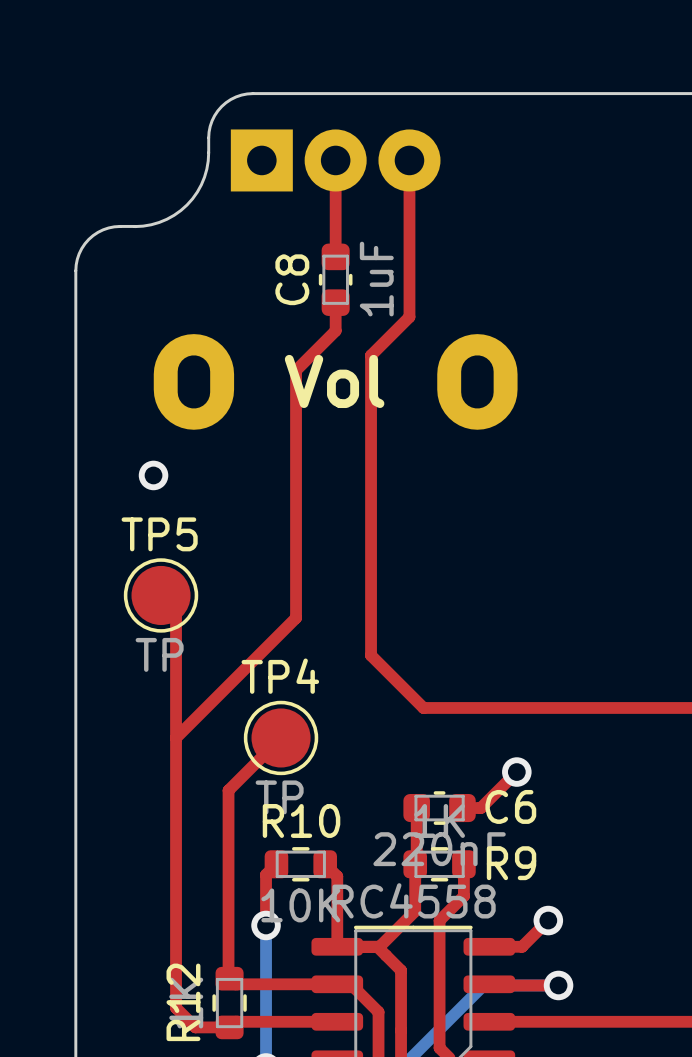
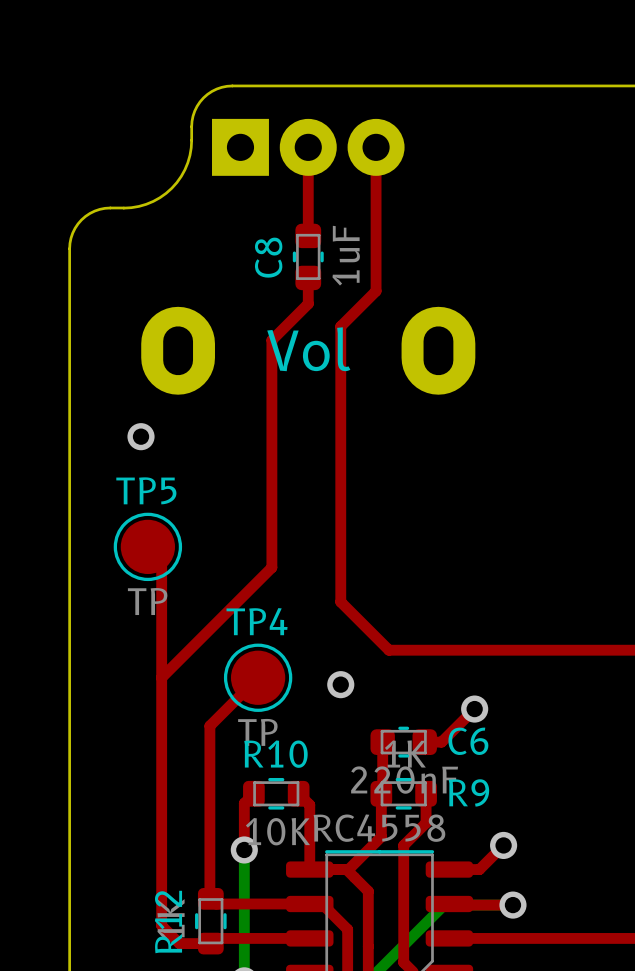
via: none -> (340, 684)

